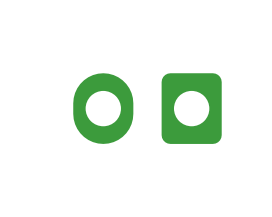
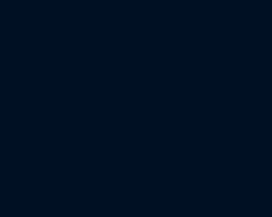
part: (147, 108) -> none

